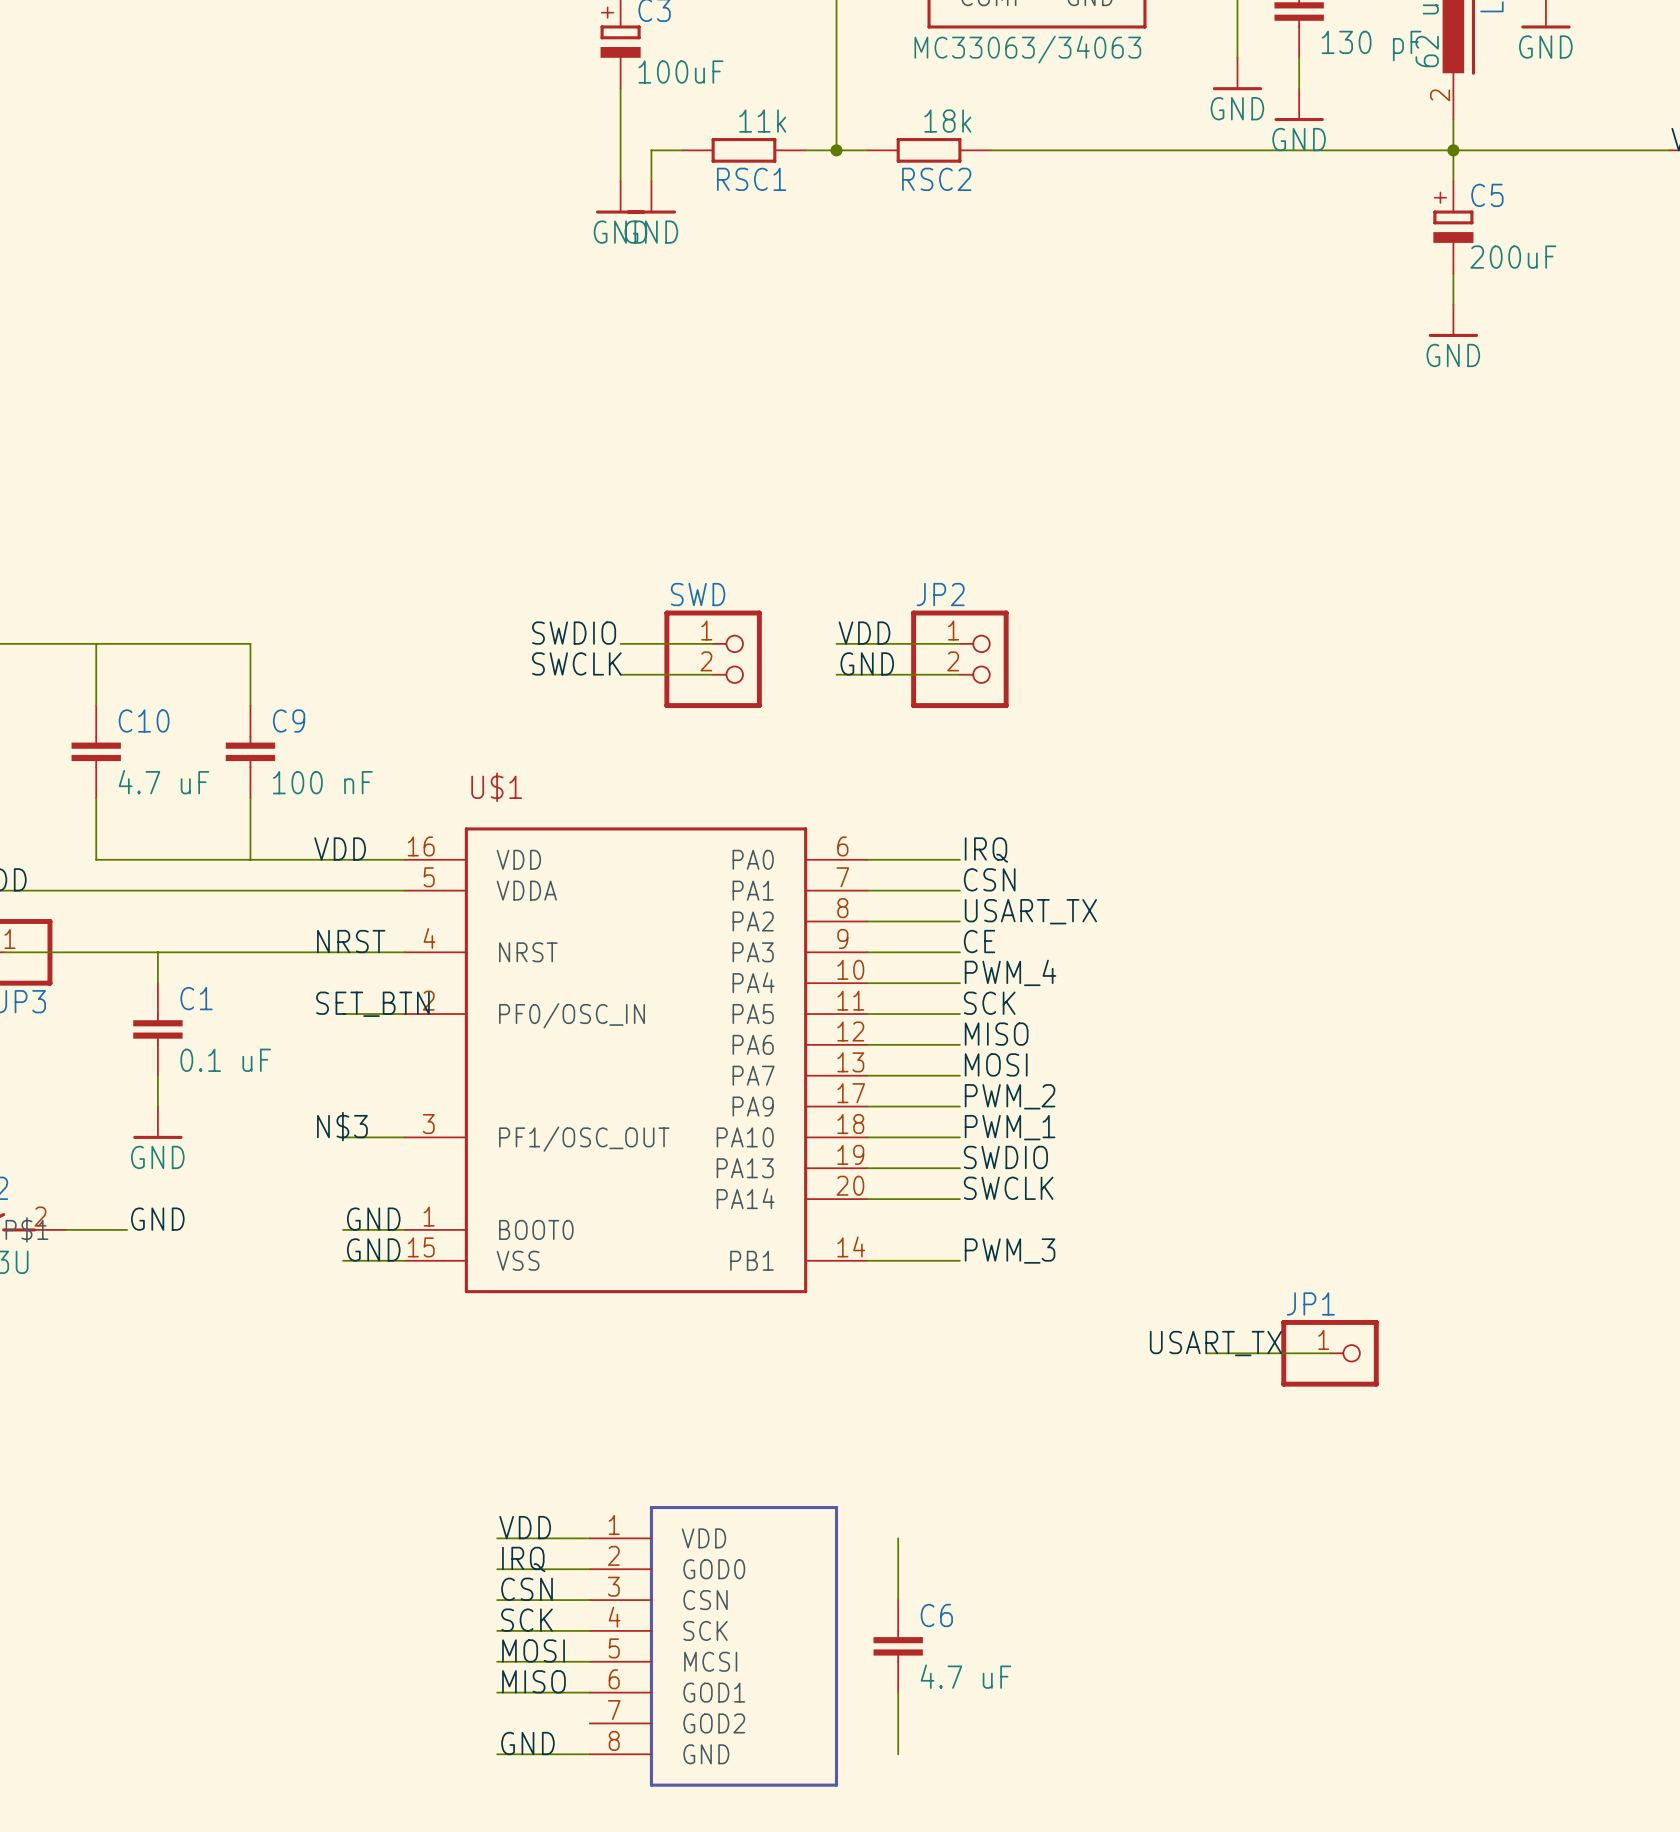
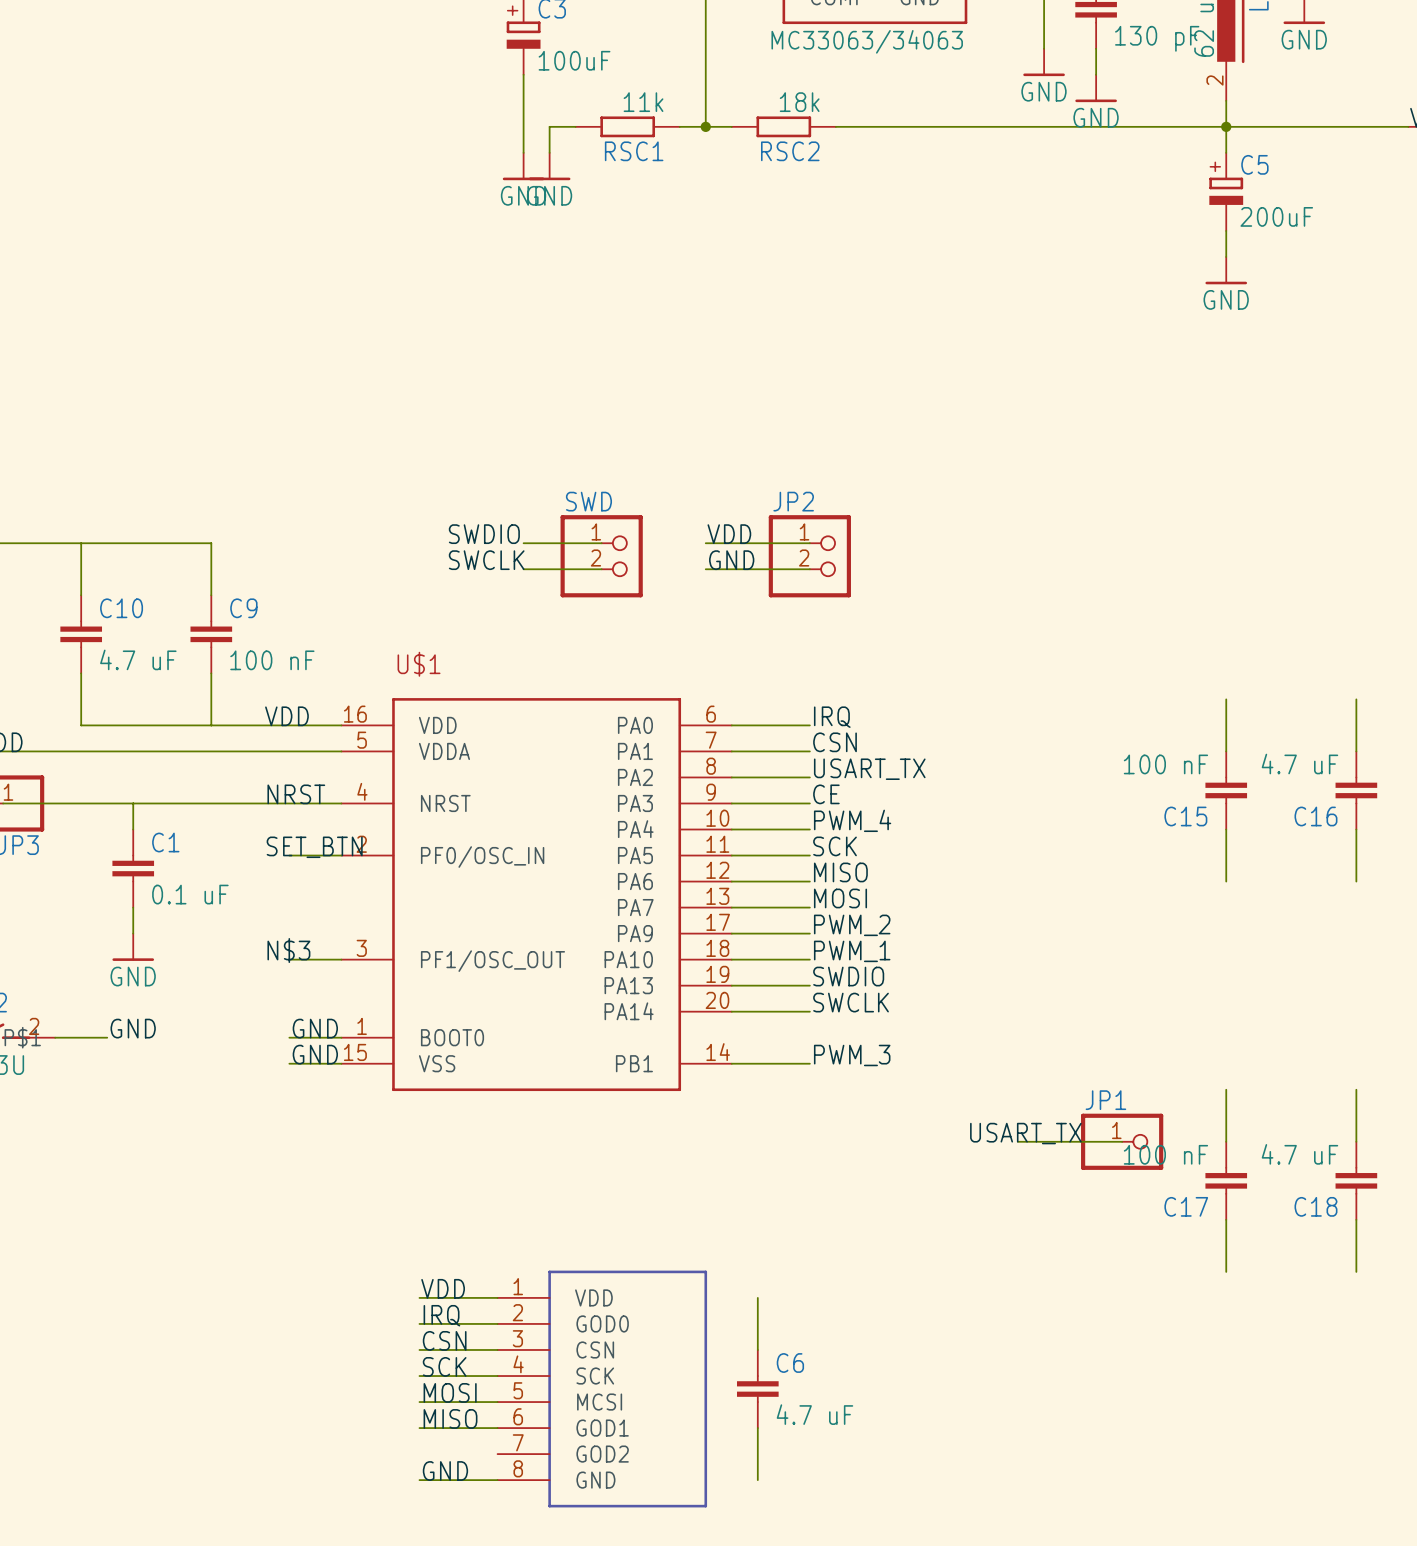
wire: none -> (1226, 699) (1226, 751)
wire: none -> (1356, 699) (1356, 751)
C15: none -> 100 nF (1226, 790)
C16: none -> 4.7 uF (1356, 790)
wire: none -> (1226, 829) (1226, 881)
wire: none -> (1356, 829) (1356, 881)
wire: none -> (1226, 1089) (1226, 1141)
wire: none -> (1356, 1089) (1356, 1141)
C17: none -> 100 nF (1226, 1180)
C18: none -> 4.7 uF (1356, 1180)
wire: none -> (1226, 1219) (1226, 1271)
wire: none -> (1356, 1219) (1356, 1271)

